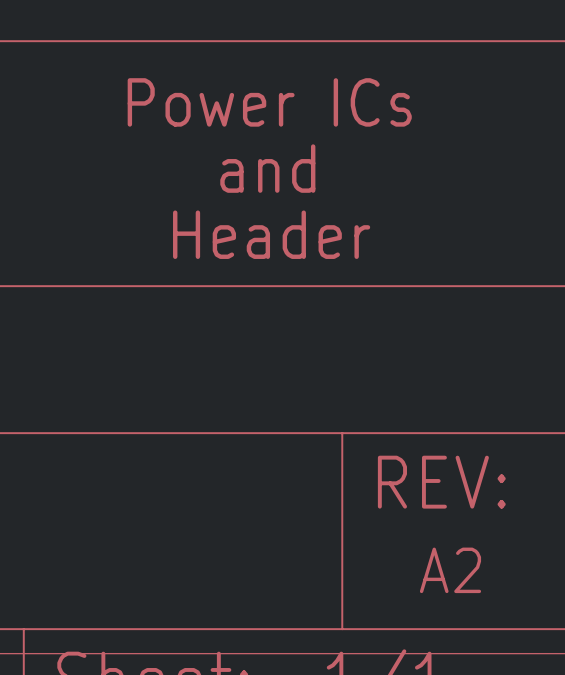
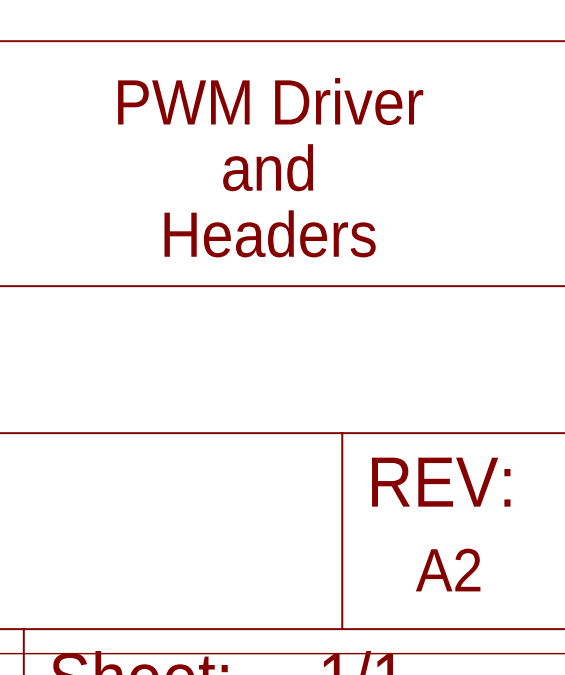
text: Power ICs (269, 102) -> PWM Driver (270, 101)
text: Header (271, 234) -> Headers (270, 233)

